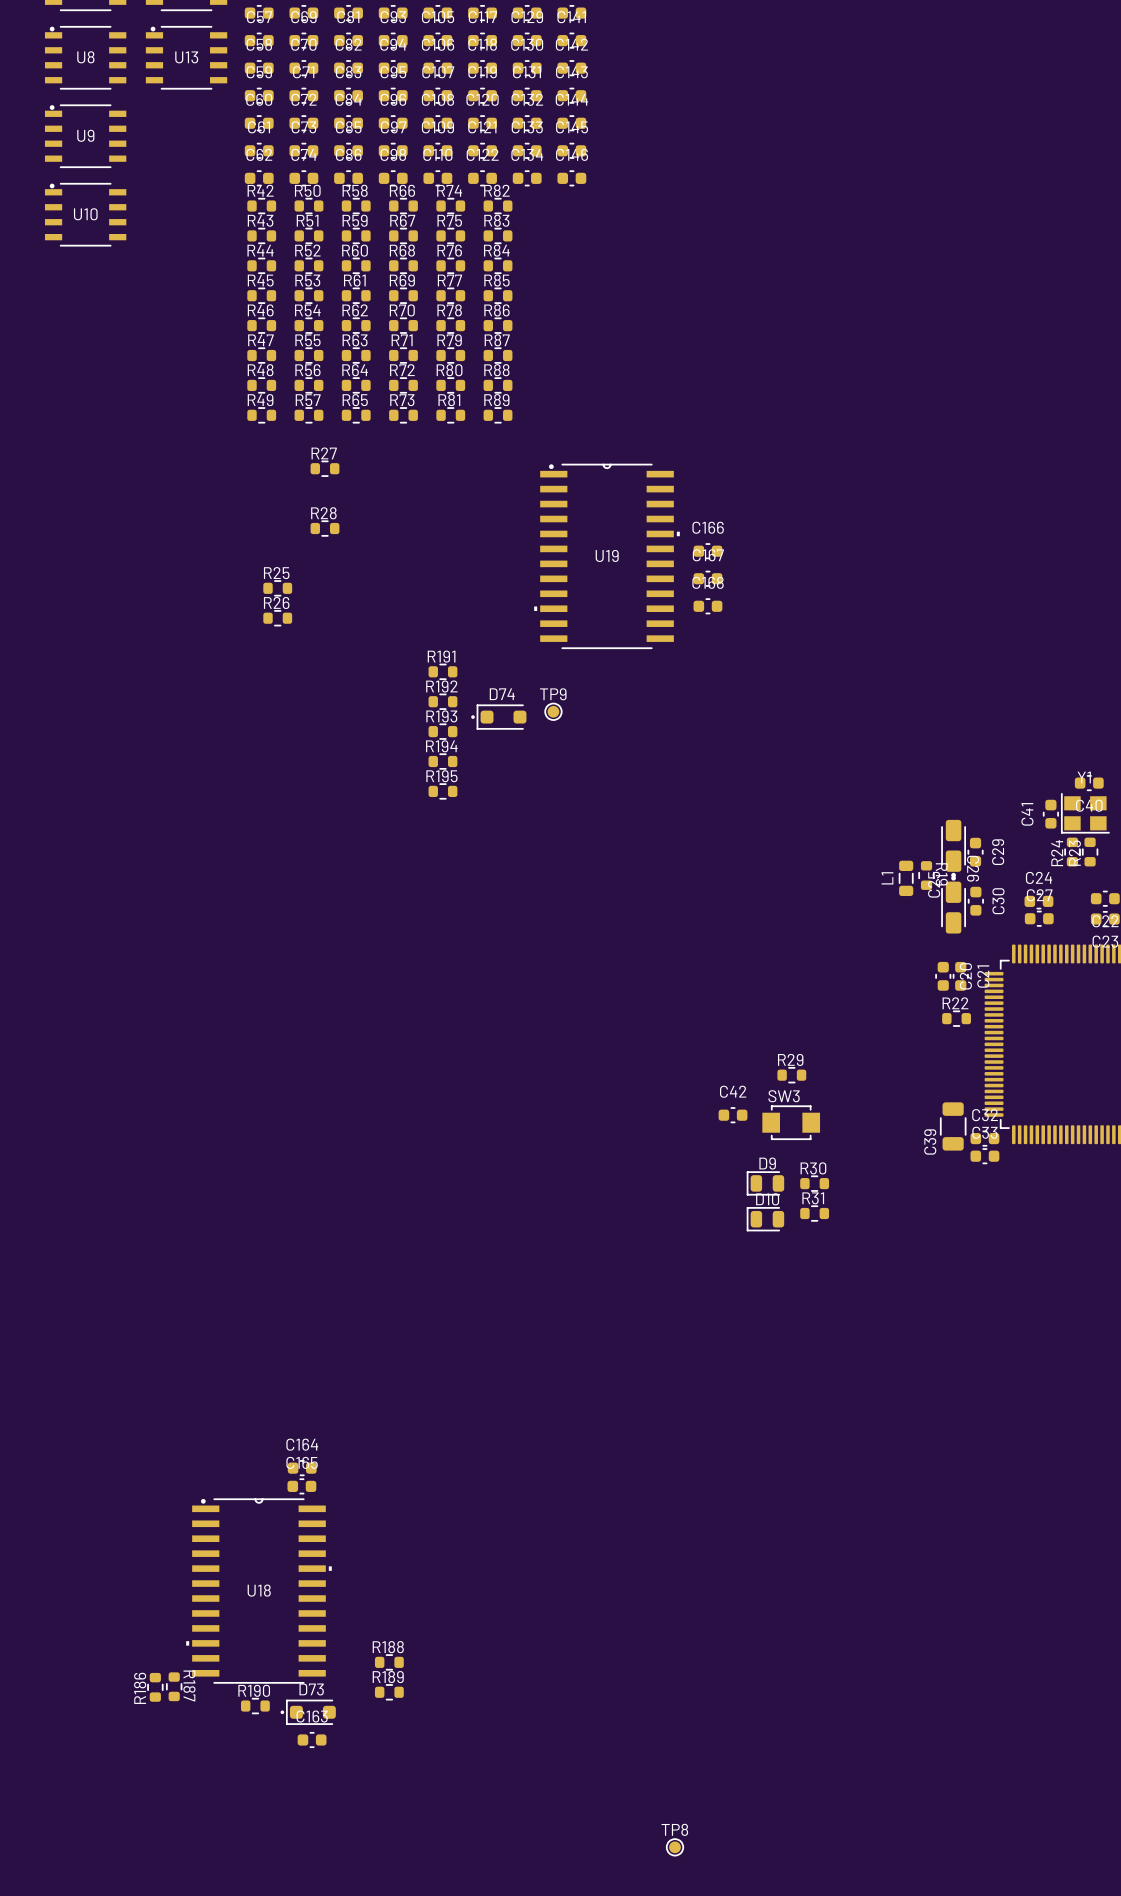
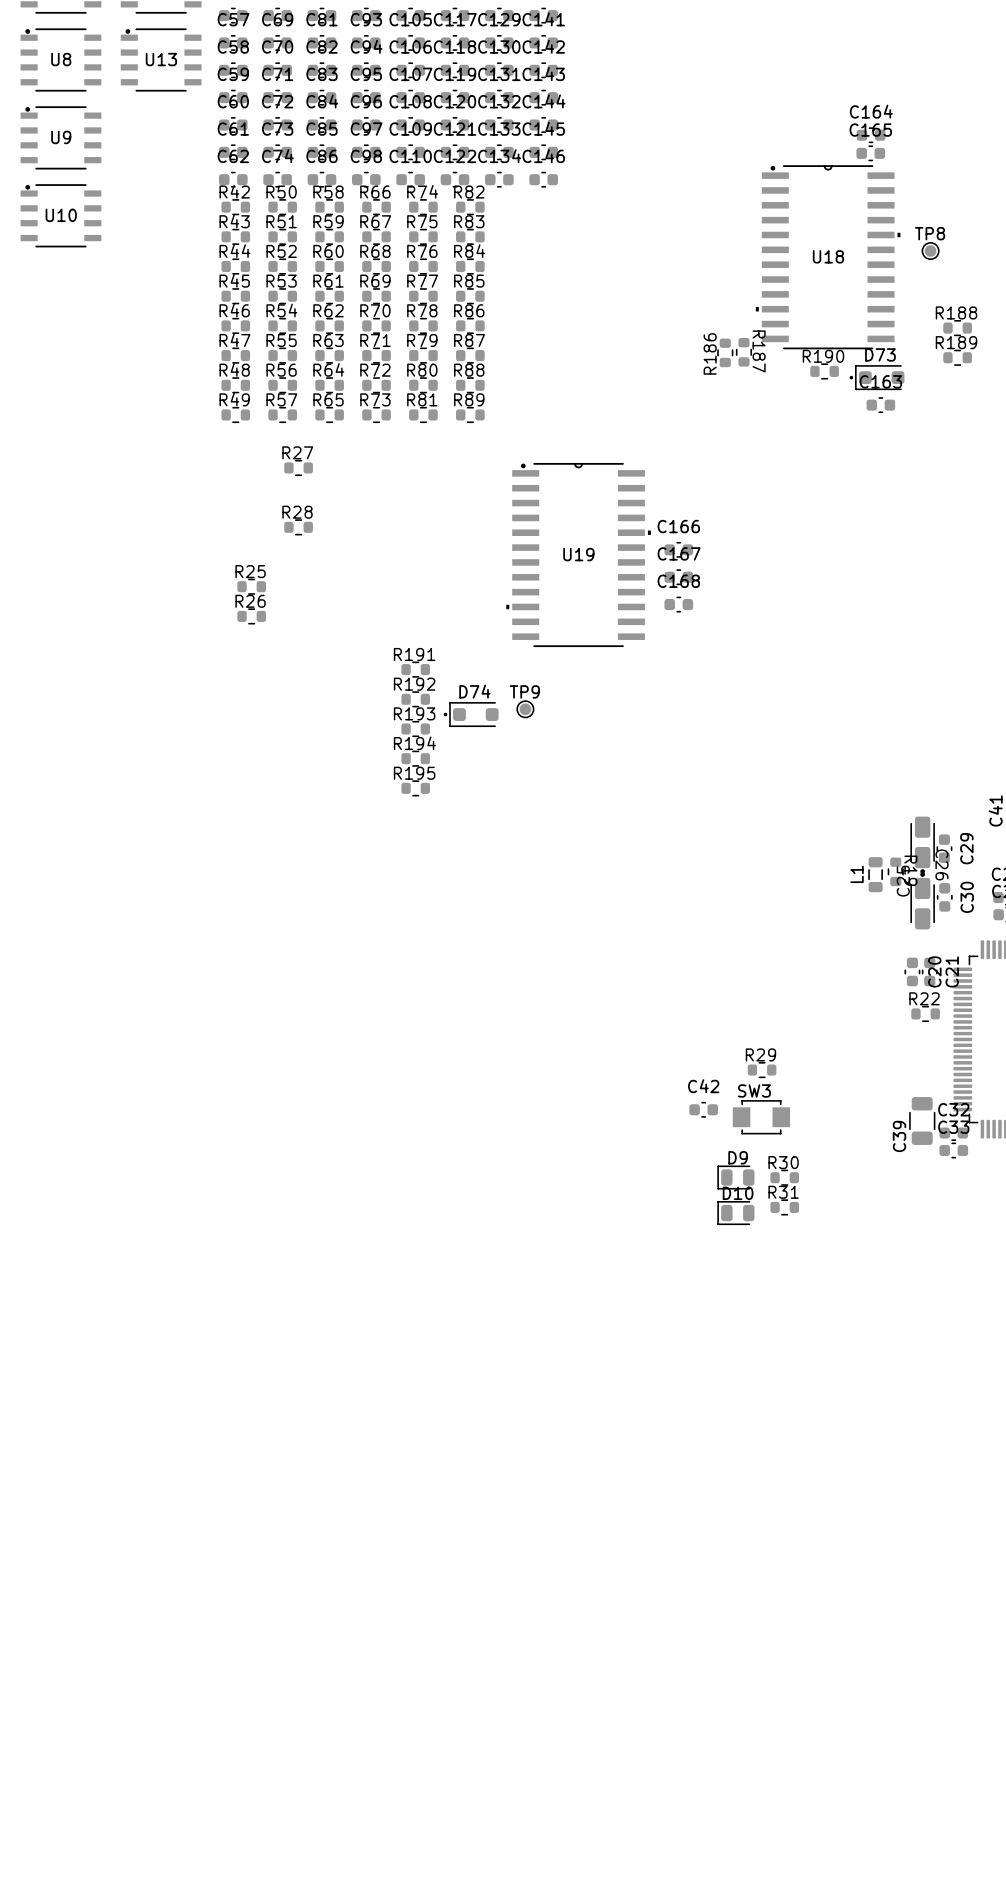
C164 position: (302, 1468) -> (871, 135)
C165 position: (301, 1486) -> (870, 153)
U18 position: (258, 1591) -> (828, 257)
R188 position: (389, 1662) -> (957, 328)
R187 position: (174, 1686) -> (743, 352)
R186 position: (155, 1687) -> (725, 352)
R189 position: (389, 1692) -> (957, 357)
R190 position: (255, 1706) -> (824, 371)
D73 position: (308, 1712) -> (877, 377)
C163 position: (312, 1739) -> (880, 405)
TP8 position: (674, 1847) -> (930, 251)

